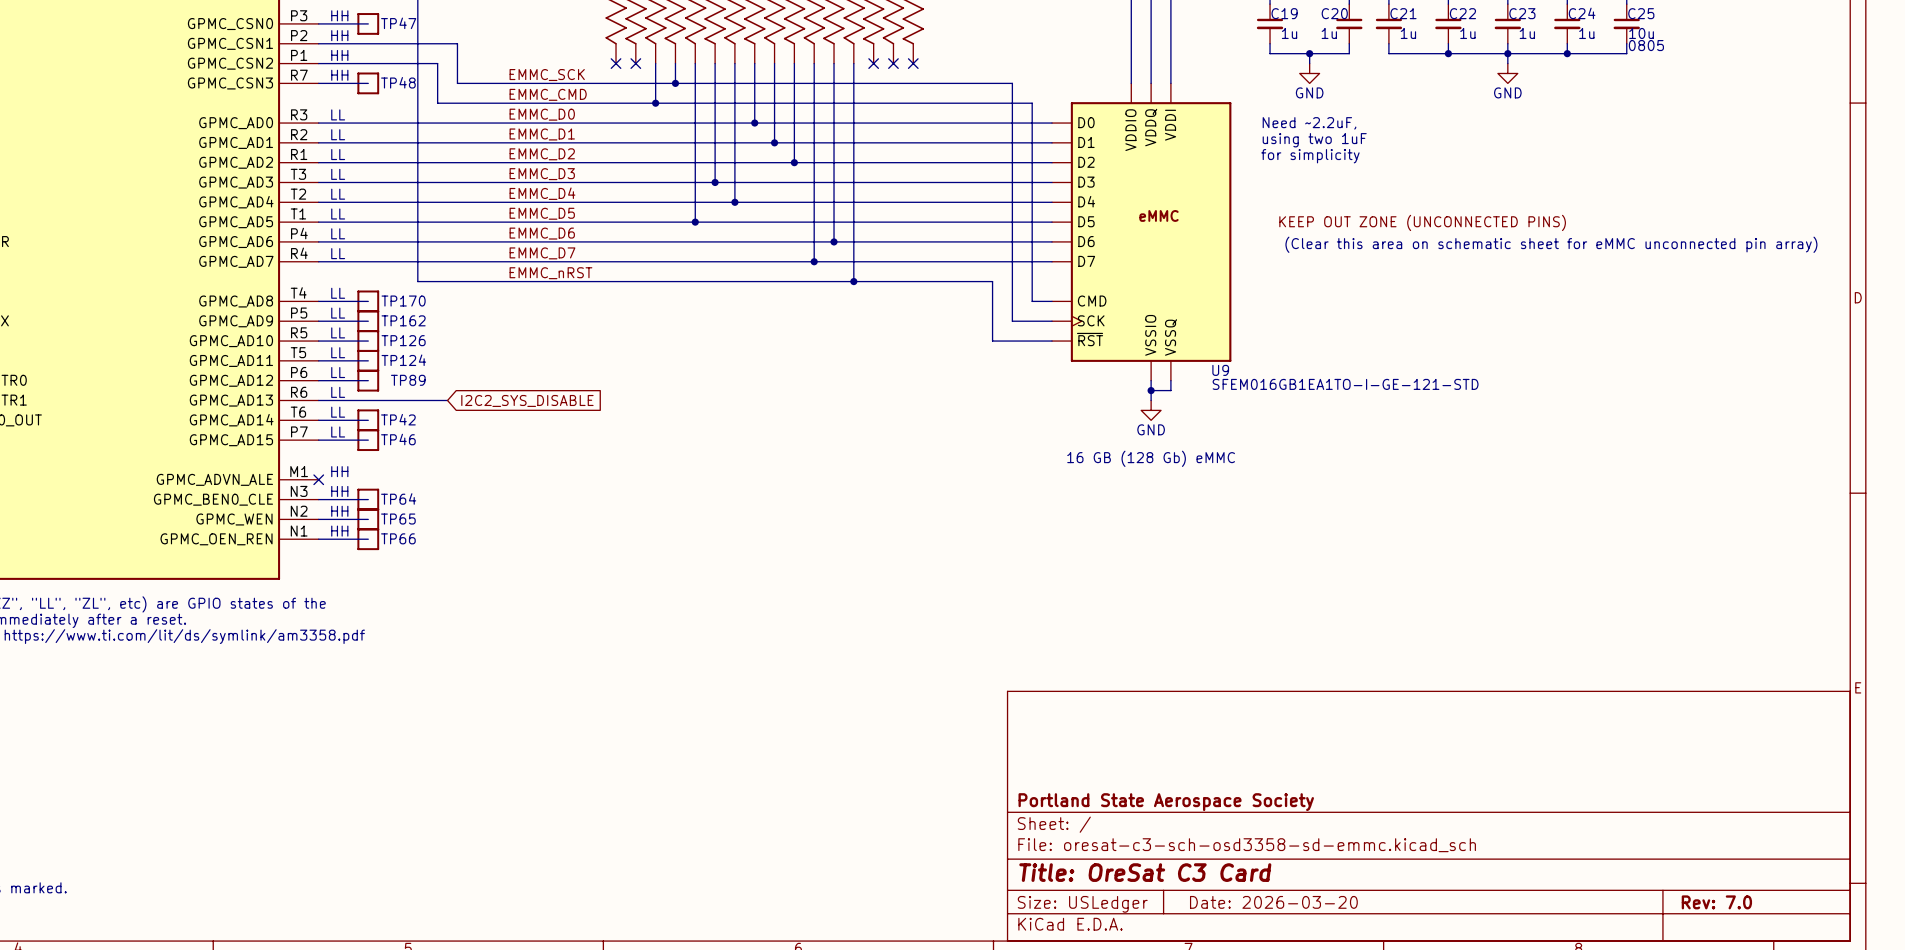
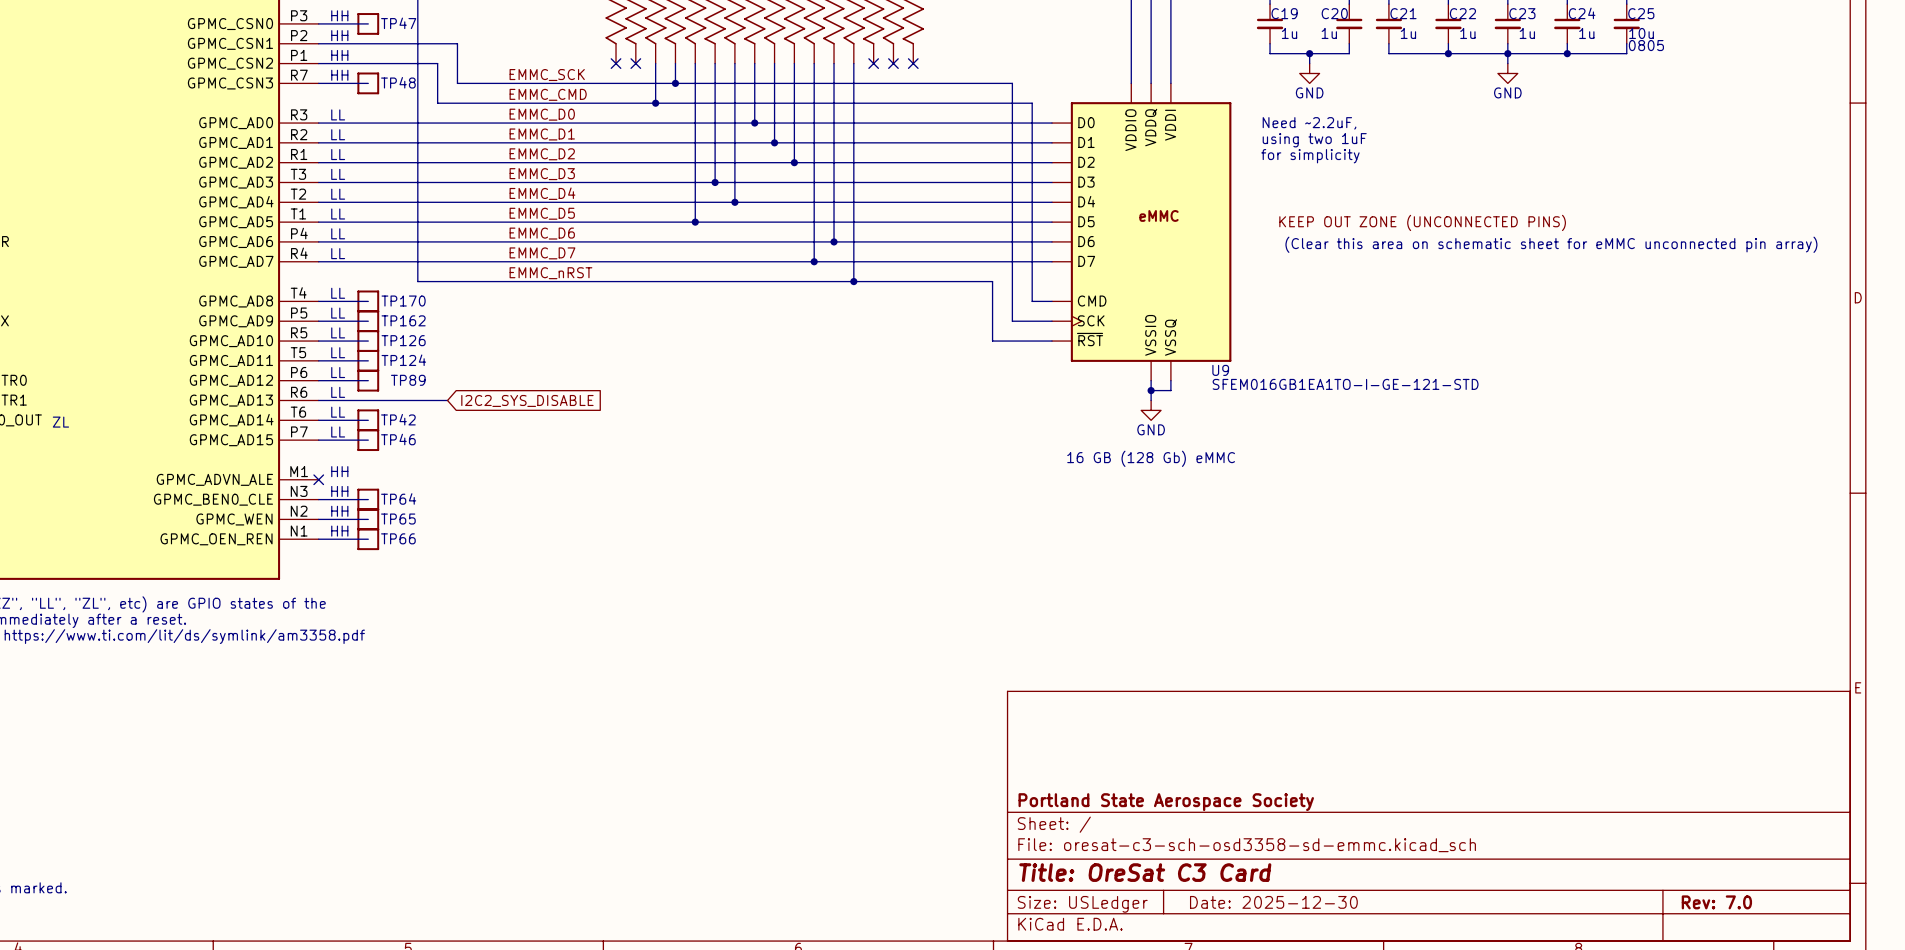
text: none -> ZL (60, 422)
title block: Date: 2026-03-20 (1273, 902) -> Date: 2025-12-30 (1273, 902)

